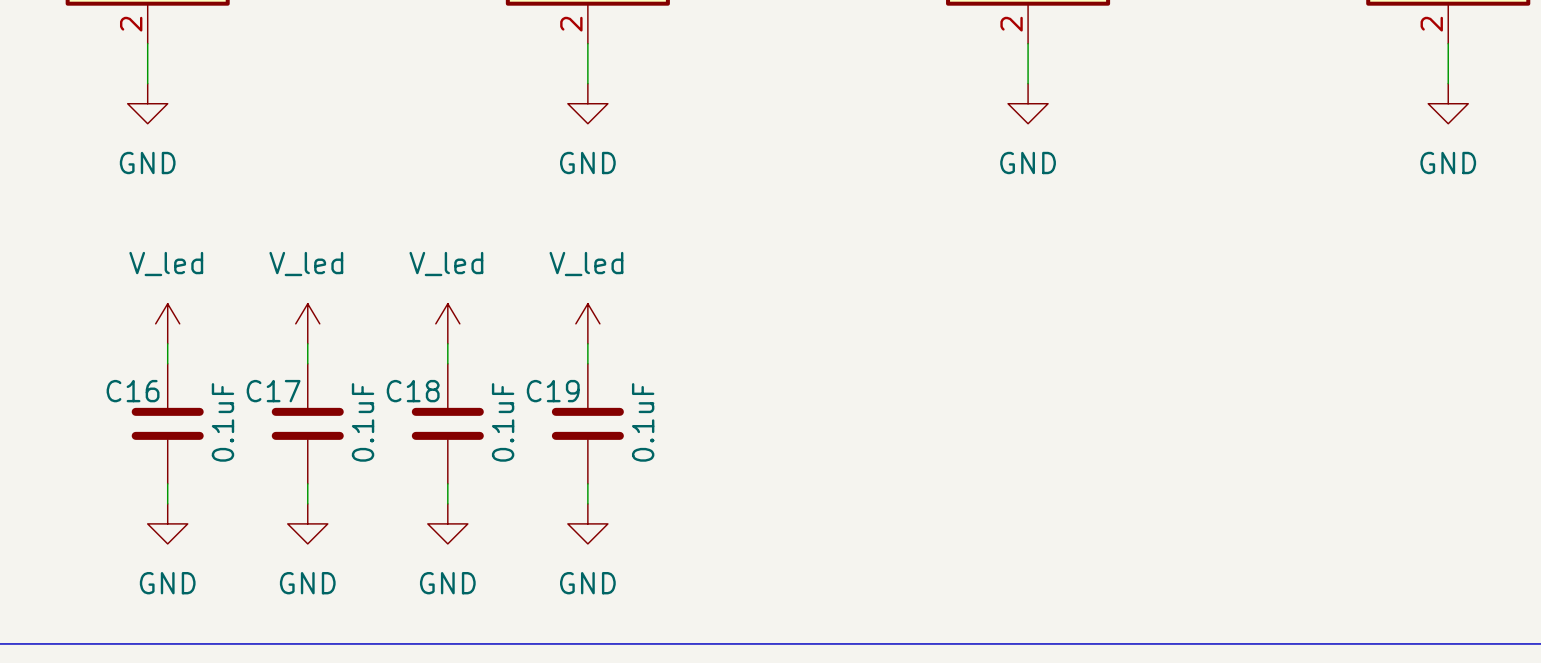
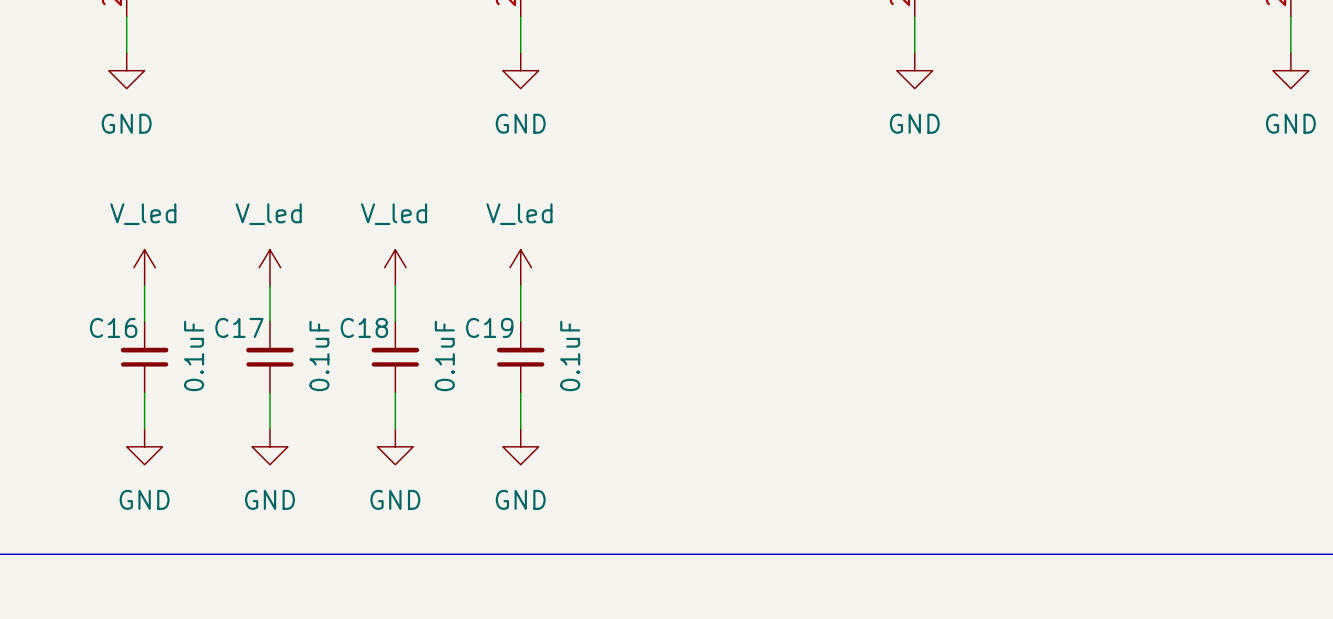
C16 symbol: [131, 363, 204, 484] -> [120, 321, 169, 394]
C17 symbol: [271, 363, 344, 484] -> [246, 321, 294, 394]
C18 symbol: [411, 363, 484, 484] -> [371, 321, 420, 394]
C19 symbol: [551, 363, 624, 484] -> [496, 321, 545, 394]

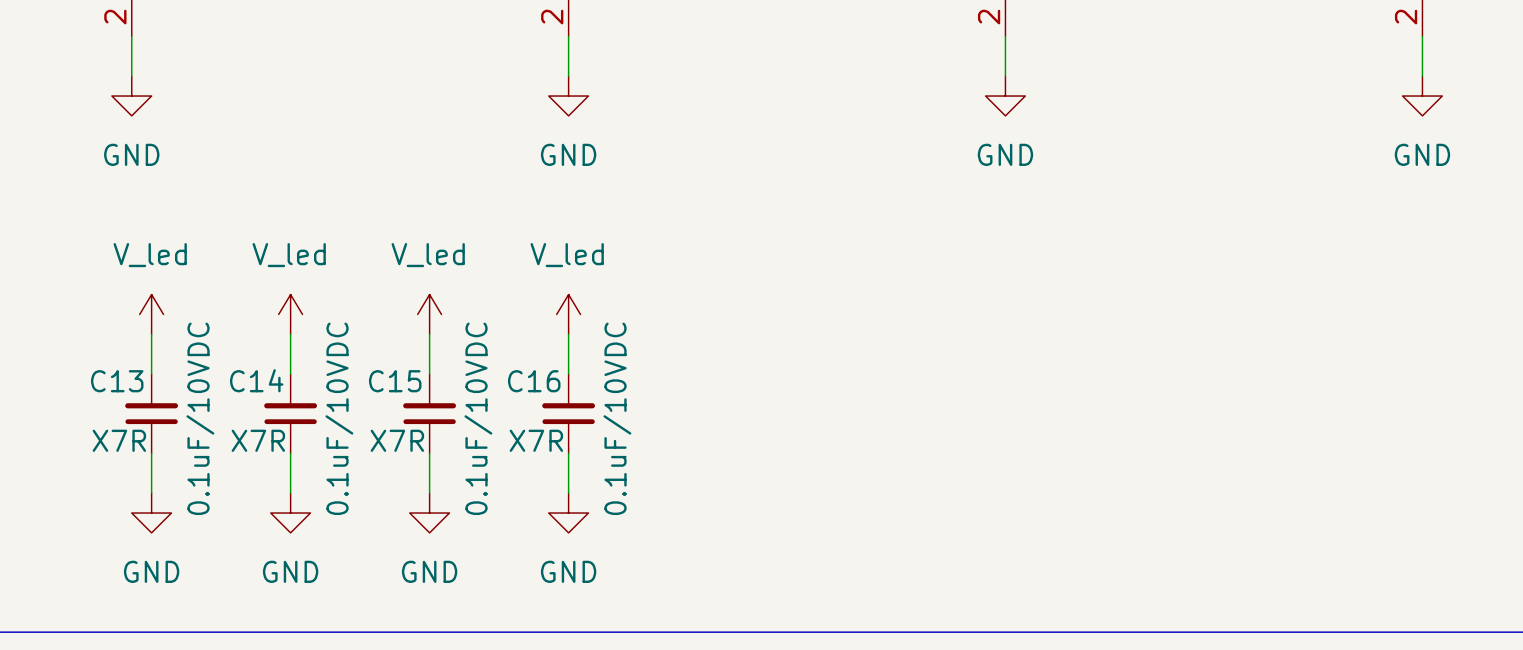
C16 name: C16 (113, 327) -> C13 (117, 381)
C17 name: C17 (239, 327) -> C14 (256, 380)
C18 name: C18 (364, 327) -> C15 (395, 381)
C19 name: C19 (489, 327) -> C16 (534, 381)
C16 value: 0.1uF (194, 355) -> 0.1uF/10VDC (200, 418)
C17 value: 0.1uF (319, 355) -> 0.1uF/10VDC (339, 418)
C18 value: 0.1uF (444, 355) -> 0.1uF/10VDC (478, 418)
C19 value: 0.1uF (570, 355) -> 0.1uF/10VDC (617, 418)
C16 text: none -> X7R (119, 440)
C17 text: none -> X7R (258, 440)
C18 text: none -> X7R (397, 440)
C19 text: none -> X7R (536, 440)

